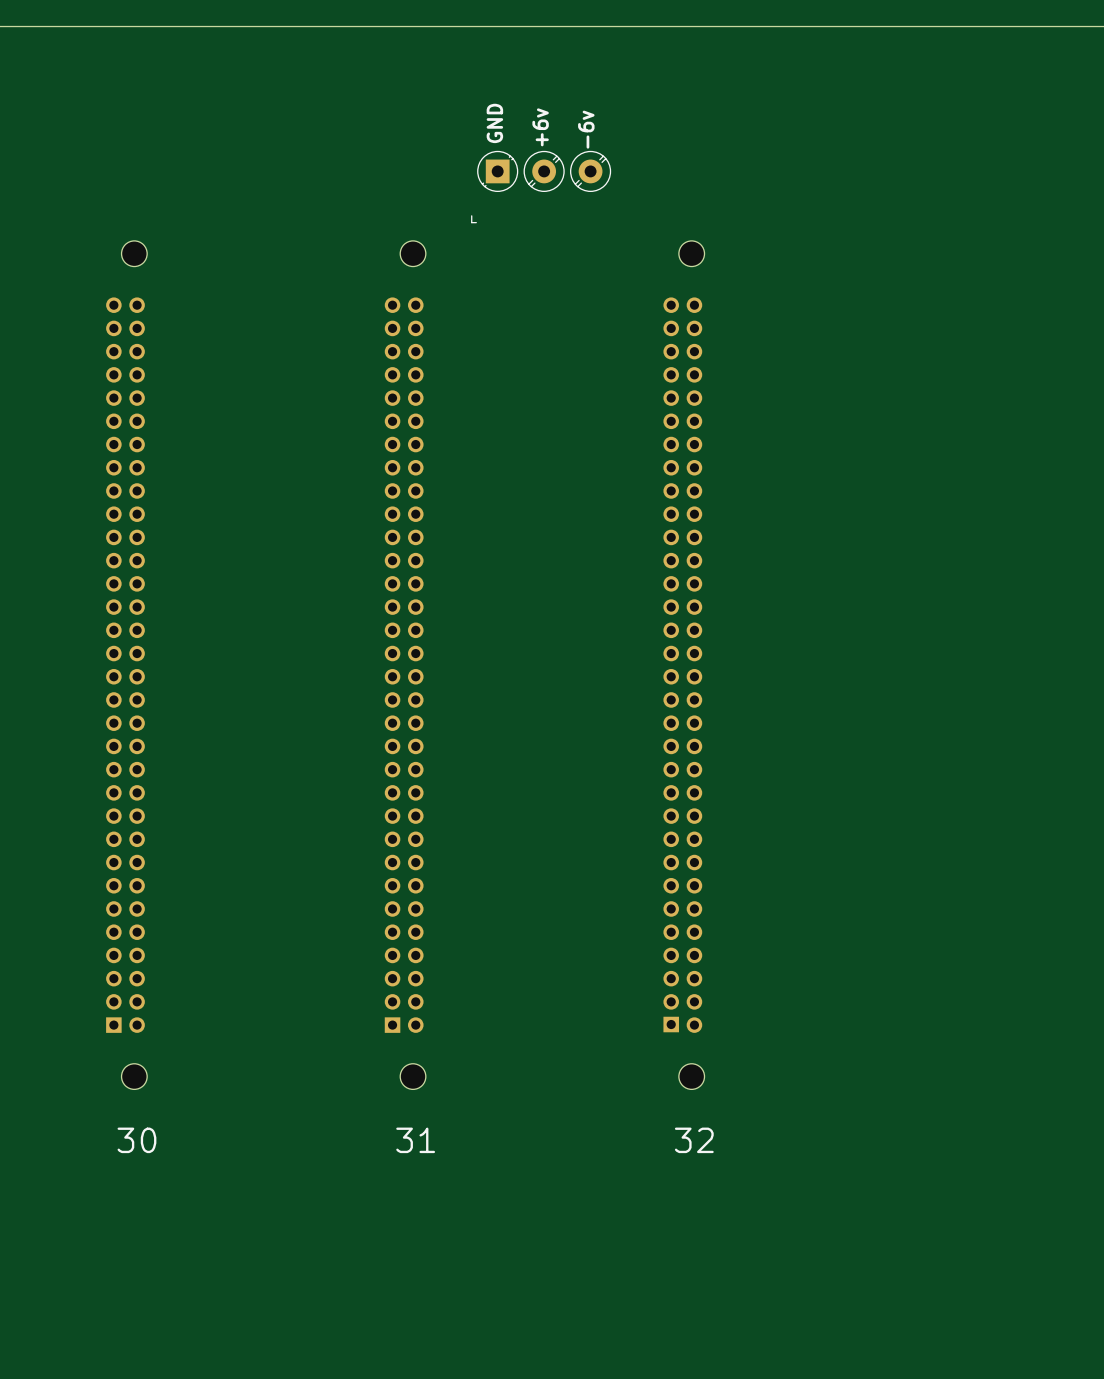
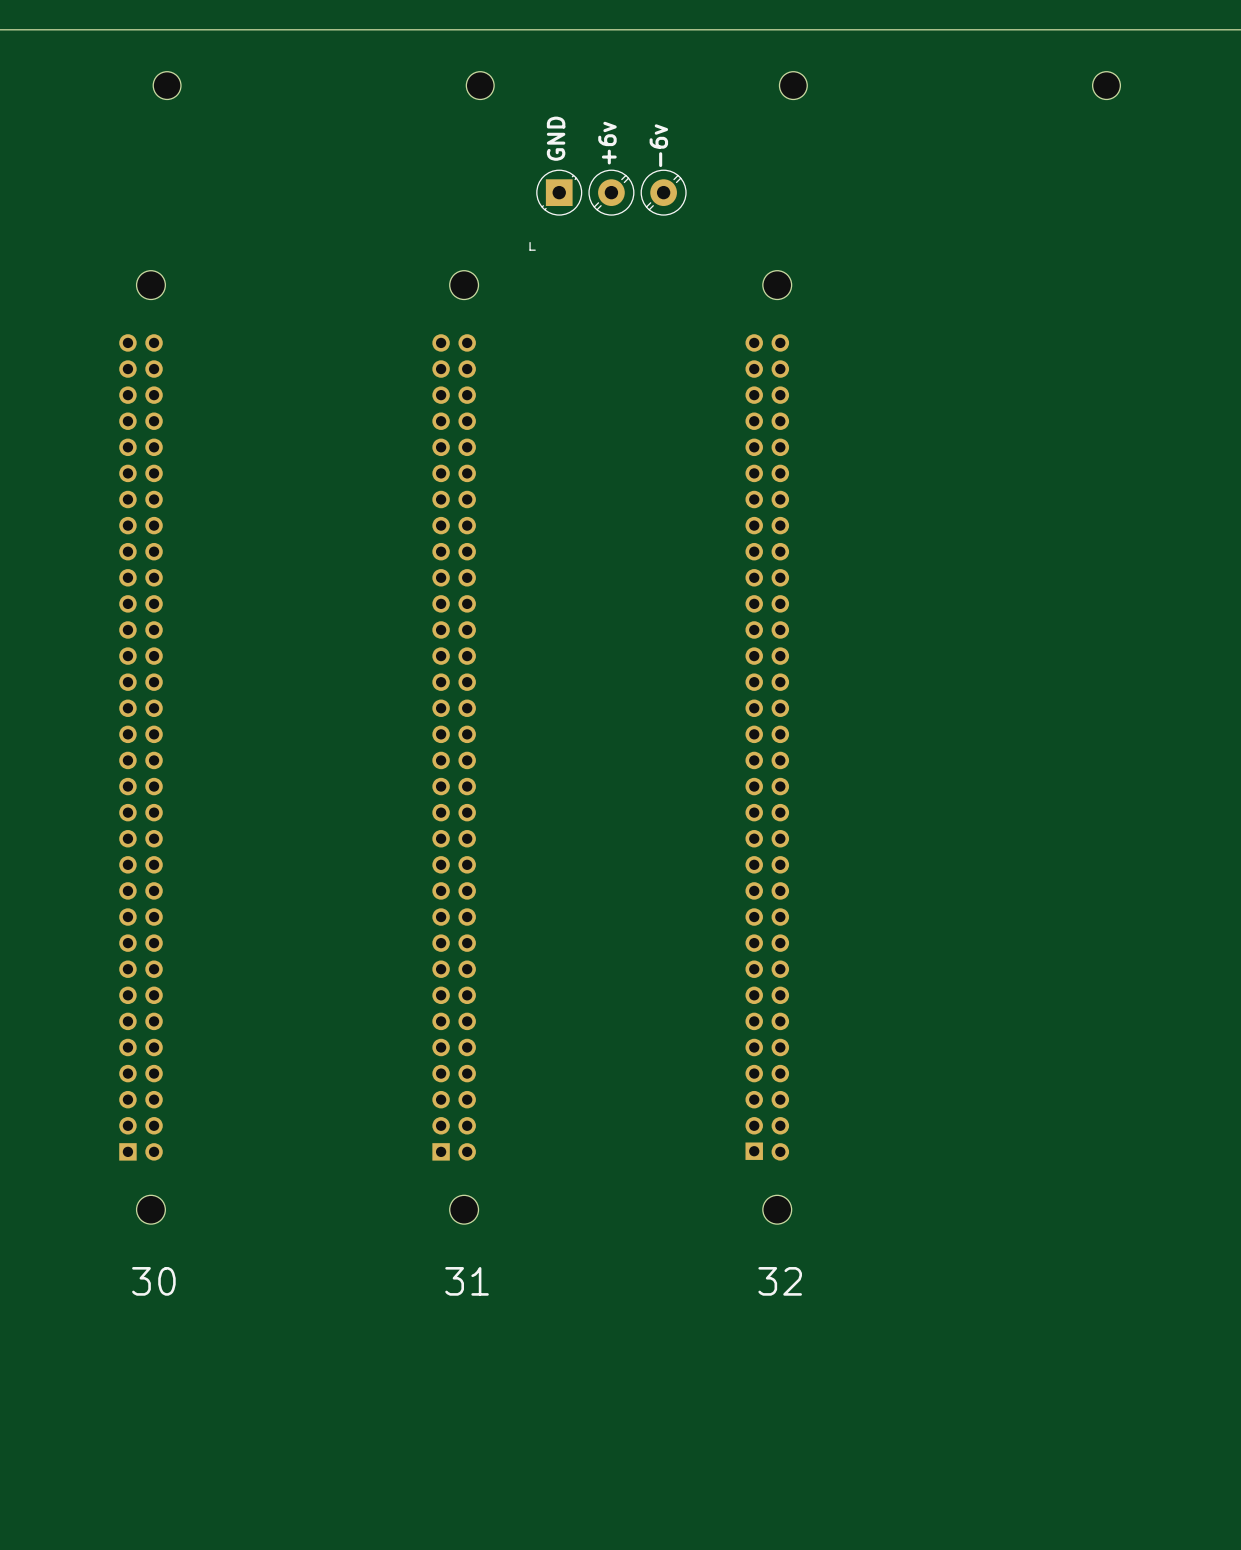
part: none -> (167, 85)
part: none -> (480, 85)
part: none -> (793, 85)
part: none -> (1106, 85)

